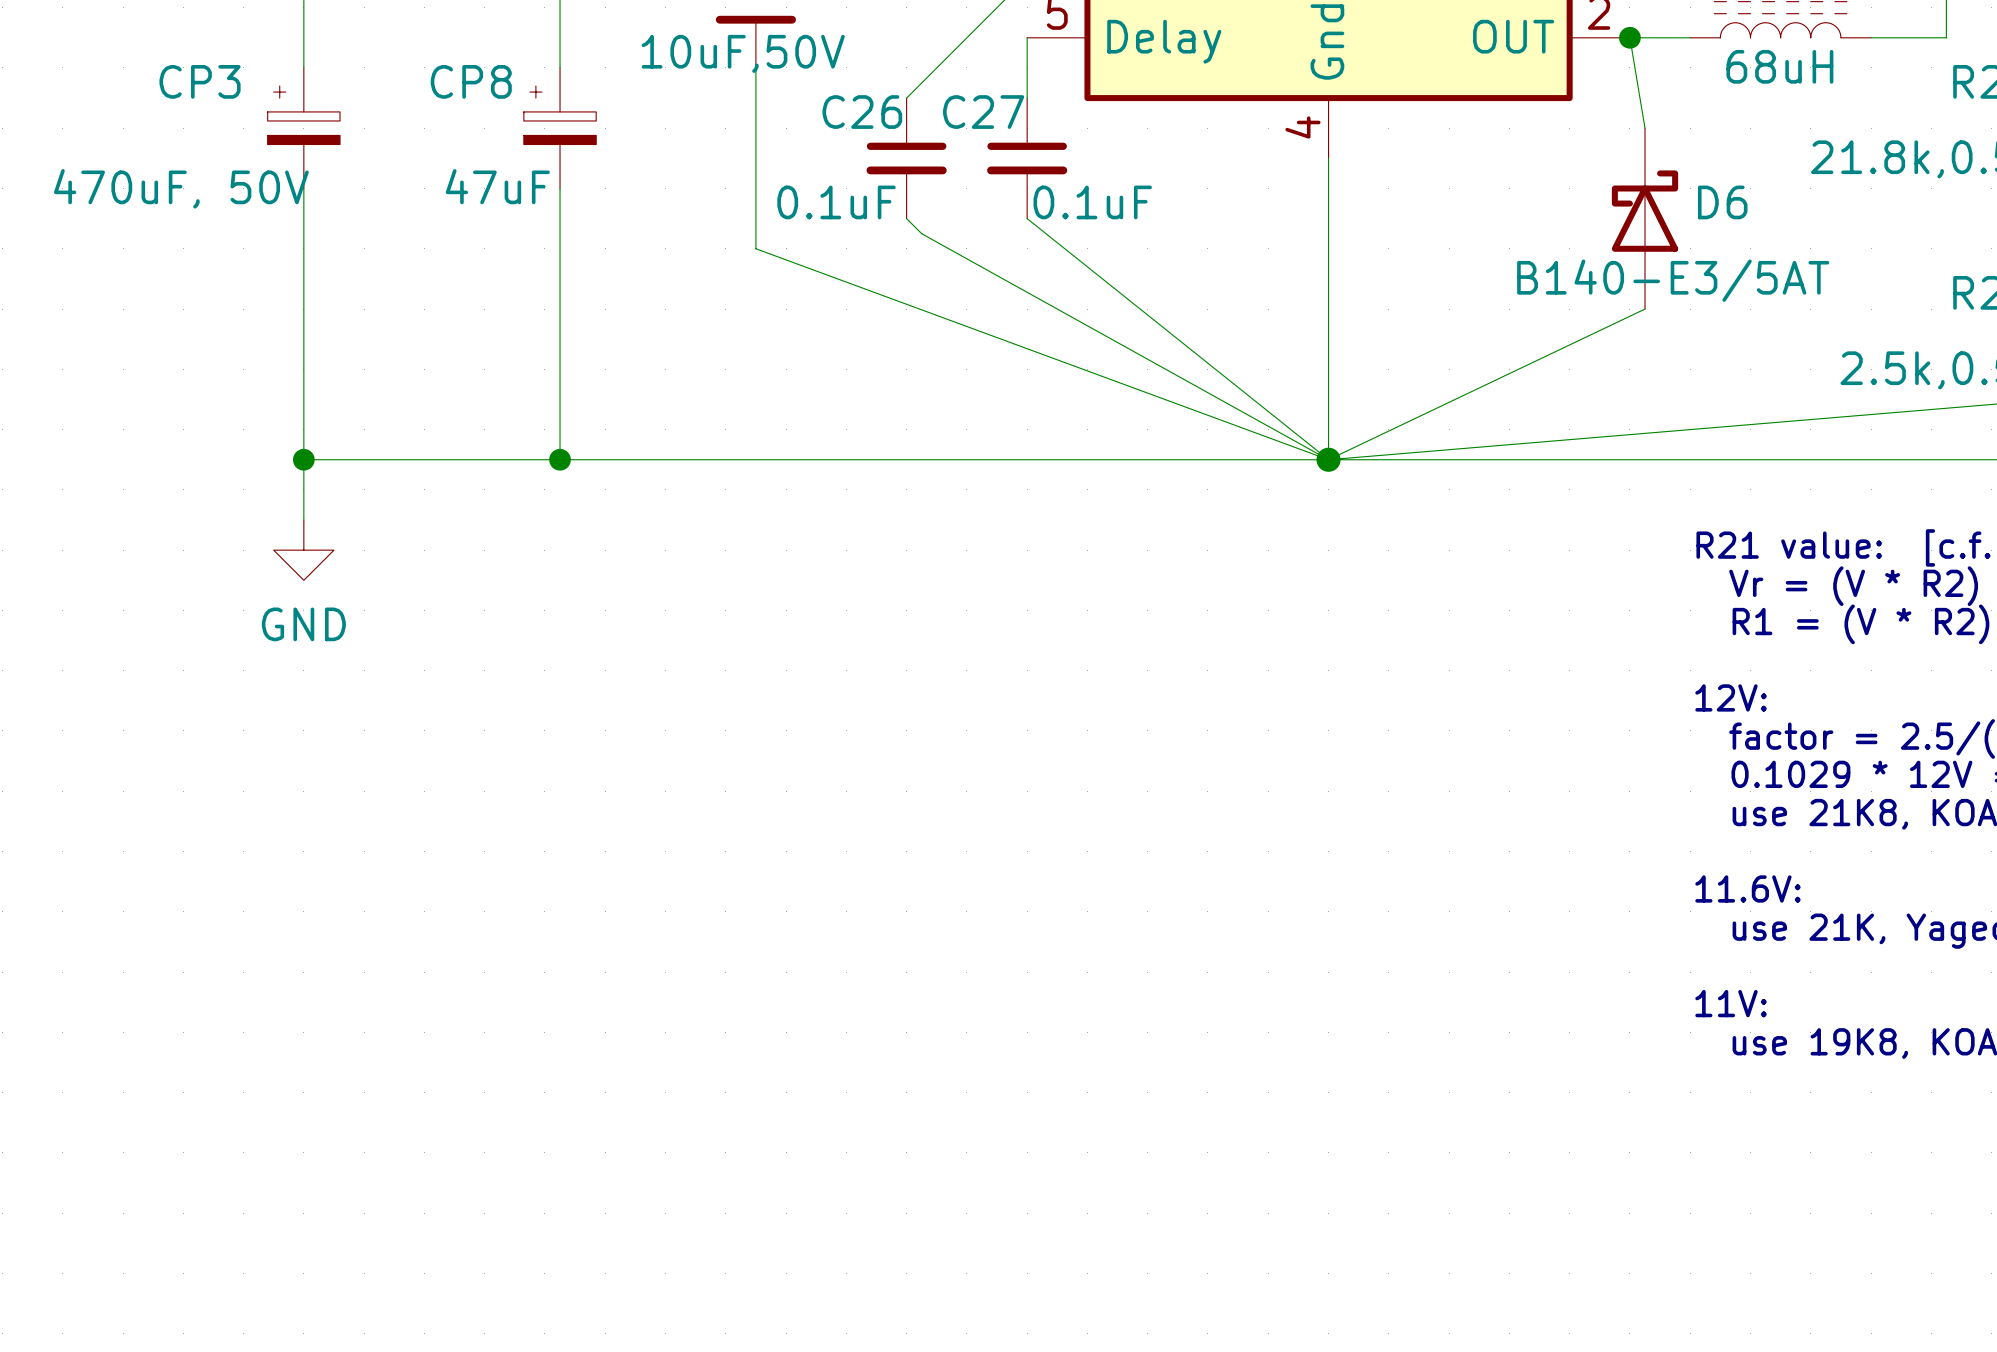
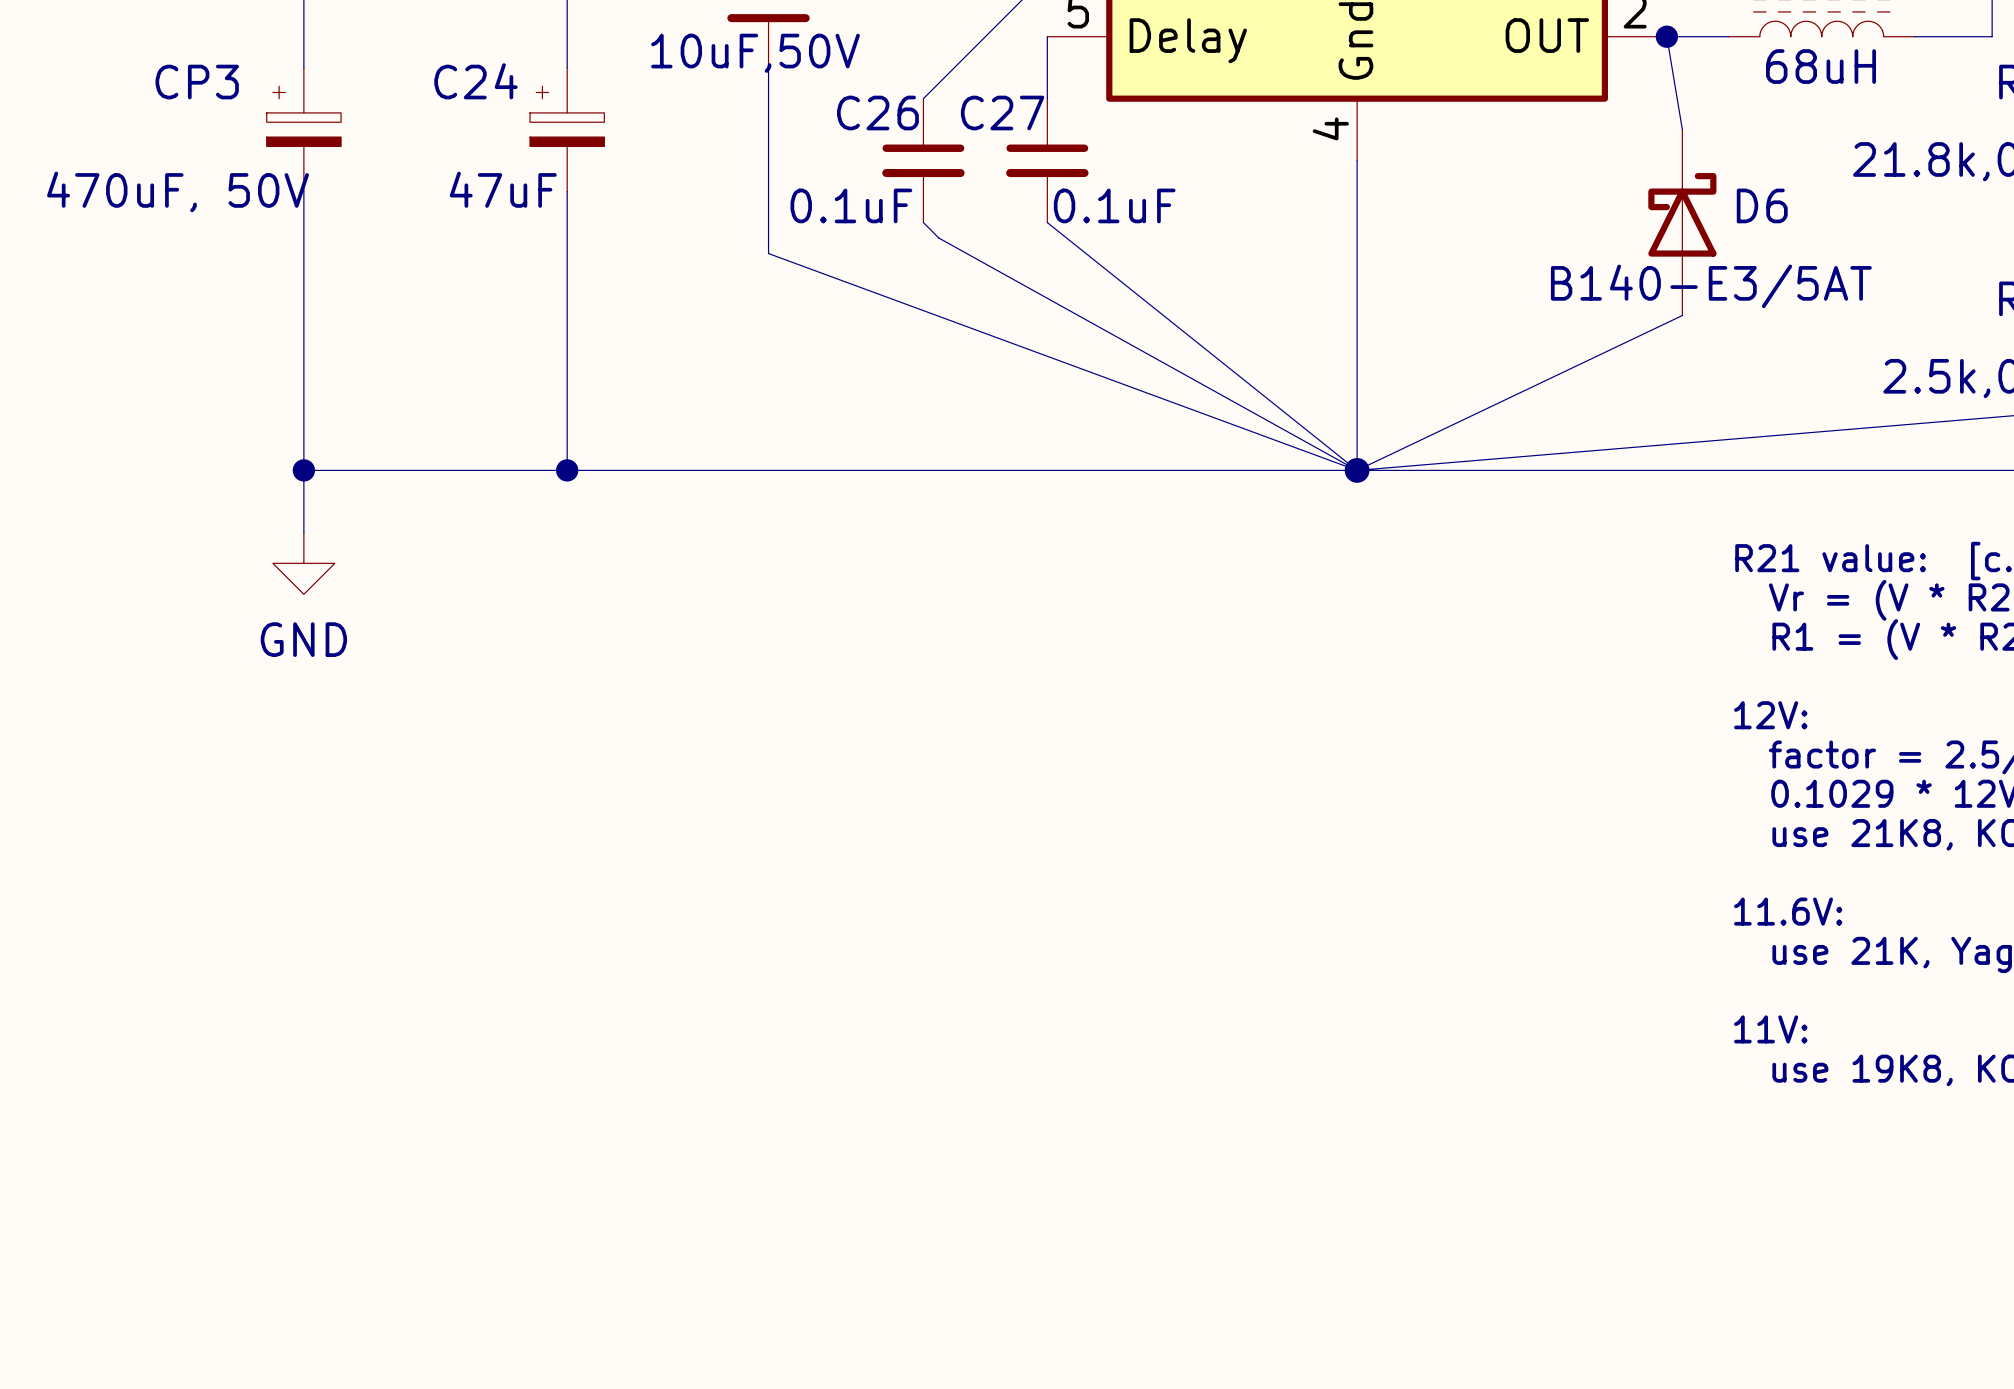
CP8 name: CP8 (471, 81) -> C24 (475, 81)

